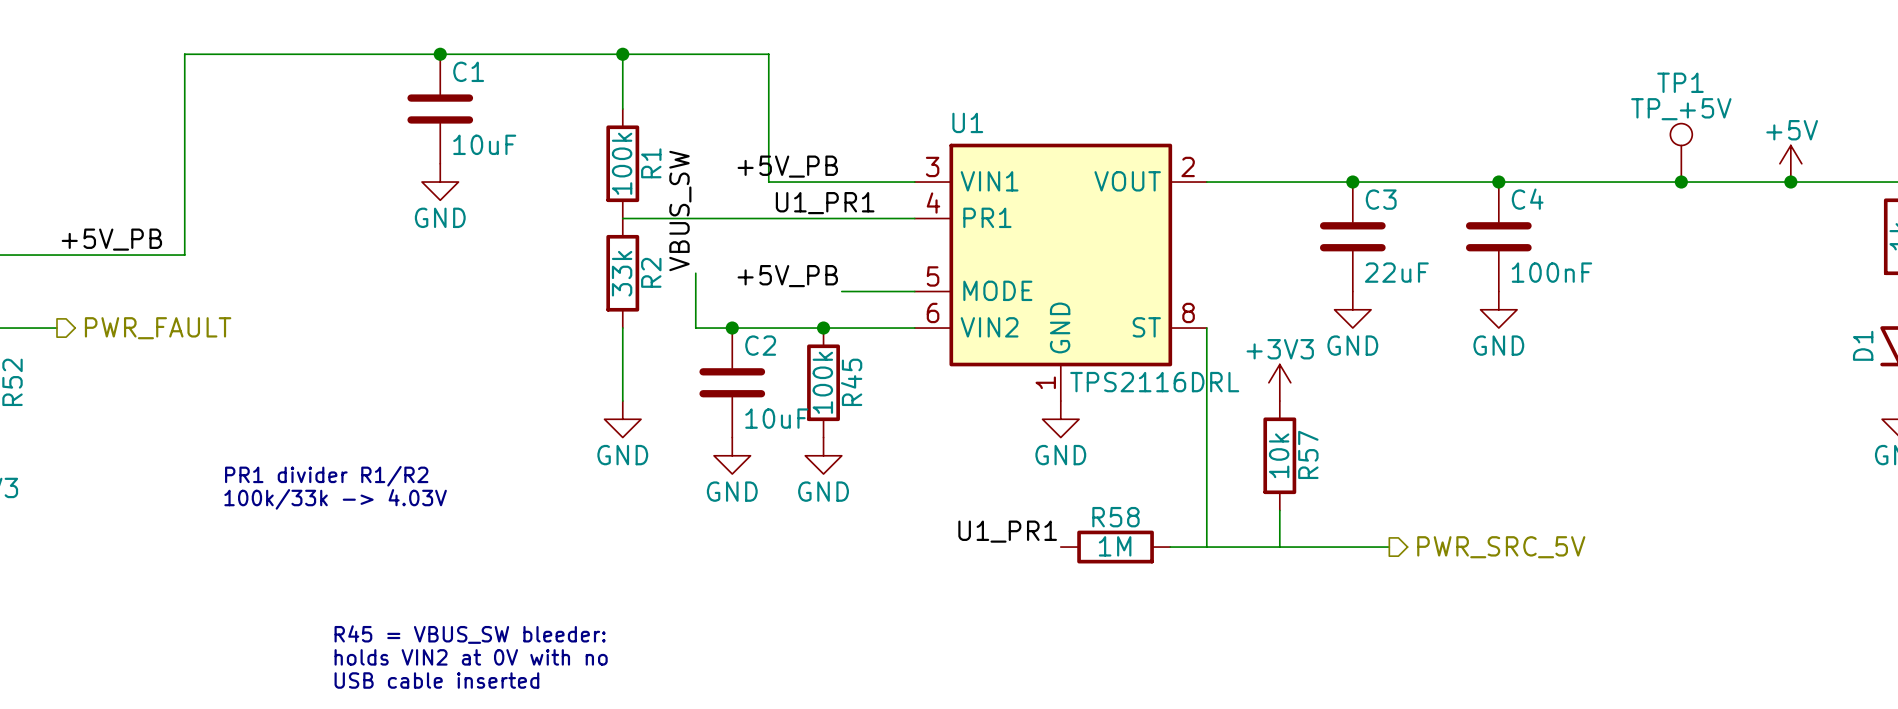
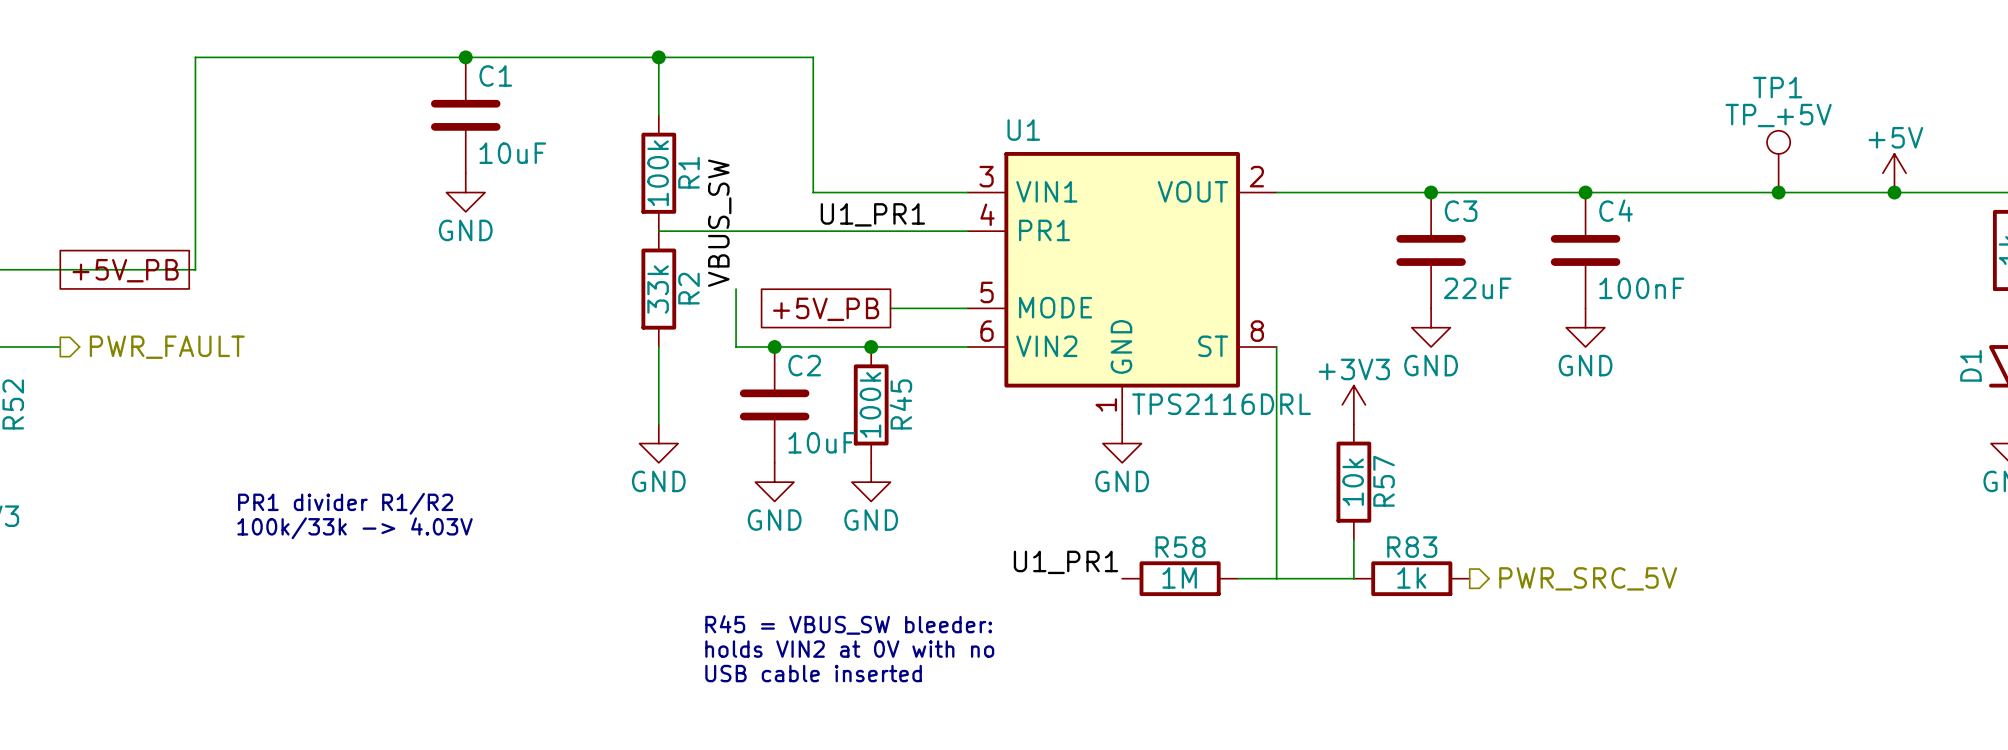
label: +5V_PB (787, 166) -> none
label: +5V_PB (111, 239) -> none
global label: none -> +5V_PB (125, 270)
label: +5V_PB (787, 276) -> none
global label: none -> +5V_PB (826, 309)
wire: (1279, 547) (1389, 547) -> none
R83: none -> 1k (1411, 578)
text position: R45 = VBUS_SW bleeder: (470, 634) -> R45 = VBUS_SW bleeder: (848, 624)
text position: holds VIN2 at 0V with no (471, 657) -> holds VIN2 at 0V with no (849, 649)
text position: USB cable inserted (436, 680) -> USB cable inserted (813, 673)

